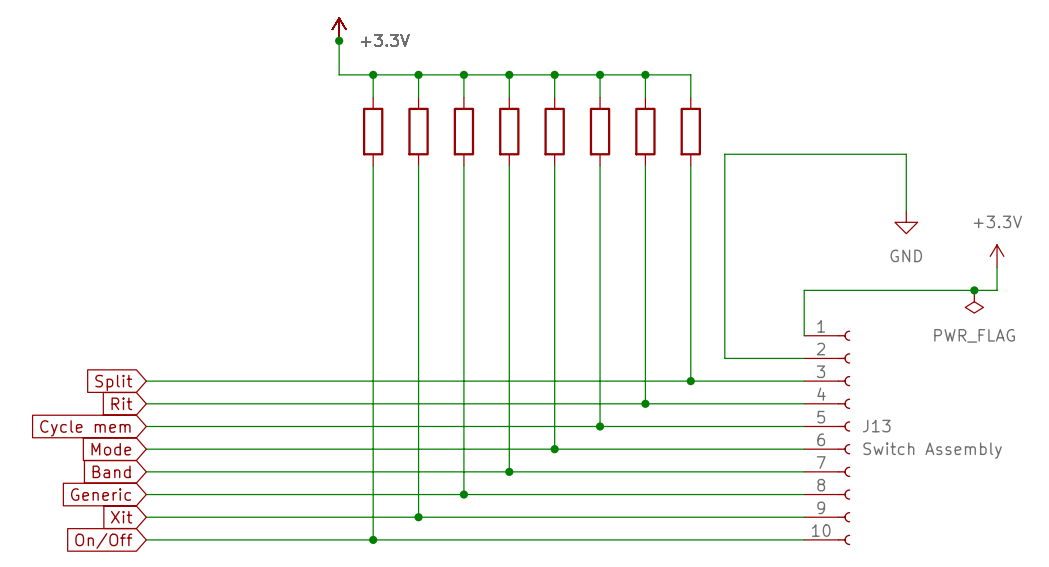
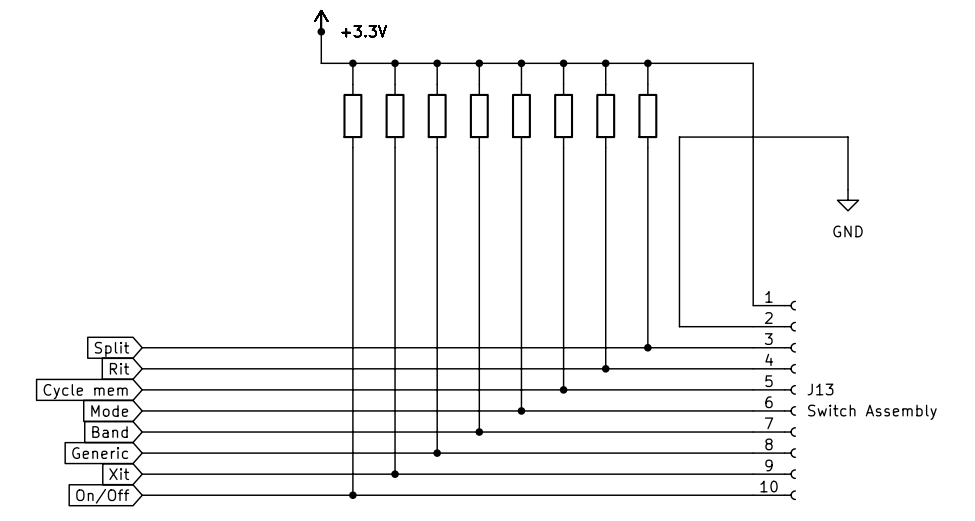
junction: none -> (647, 63)
power symbol: +3.3V (997, 256) -> none
wire: (997, 267) (997, 290) (804, 290) -> (647, 63) (753, 63) (753, 263)
junction: (974, 290) -> none
power symbol: PWR_FLAG (974, 301) -> none

